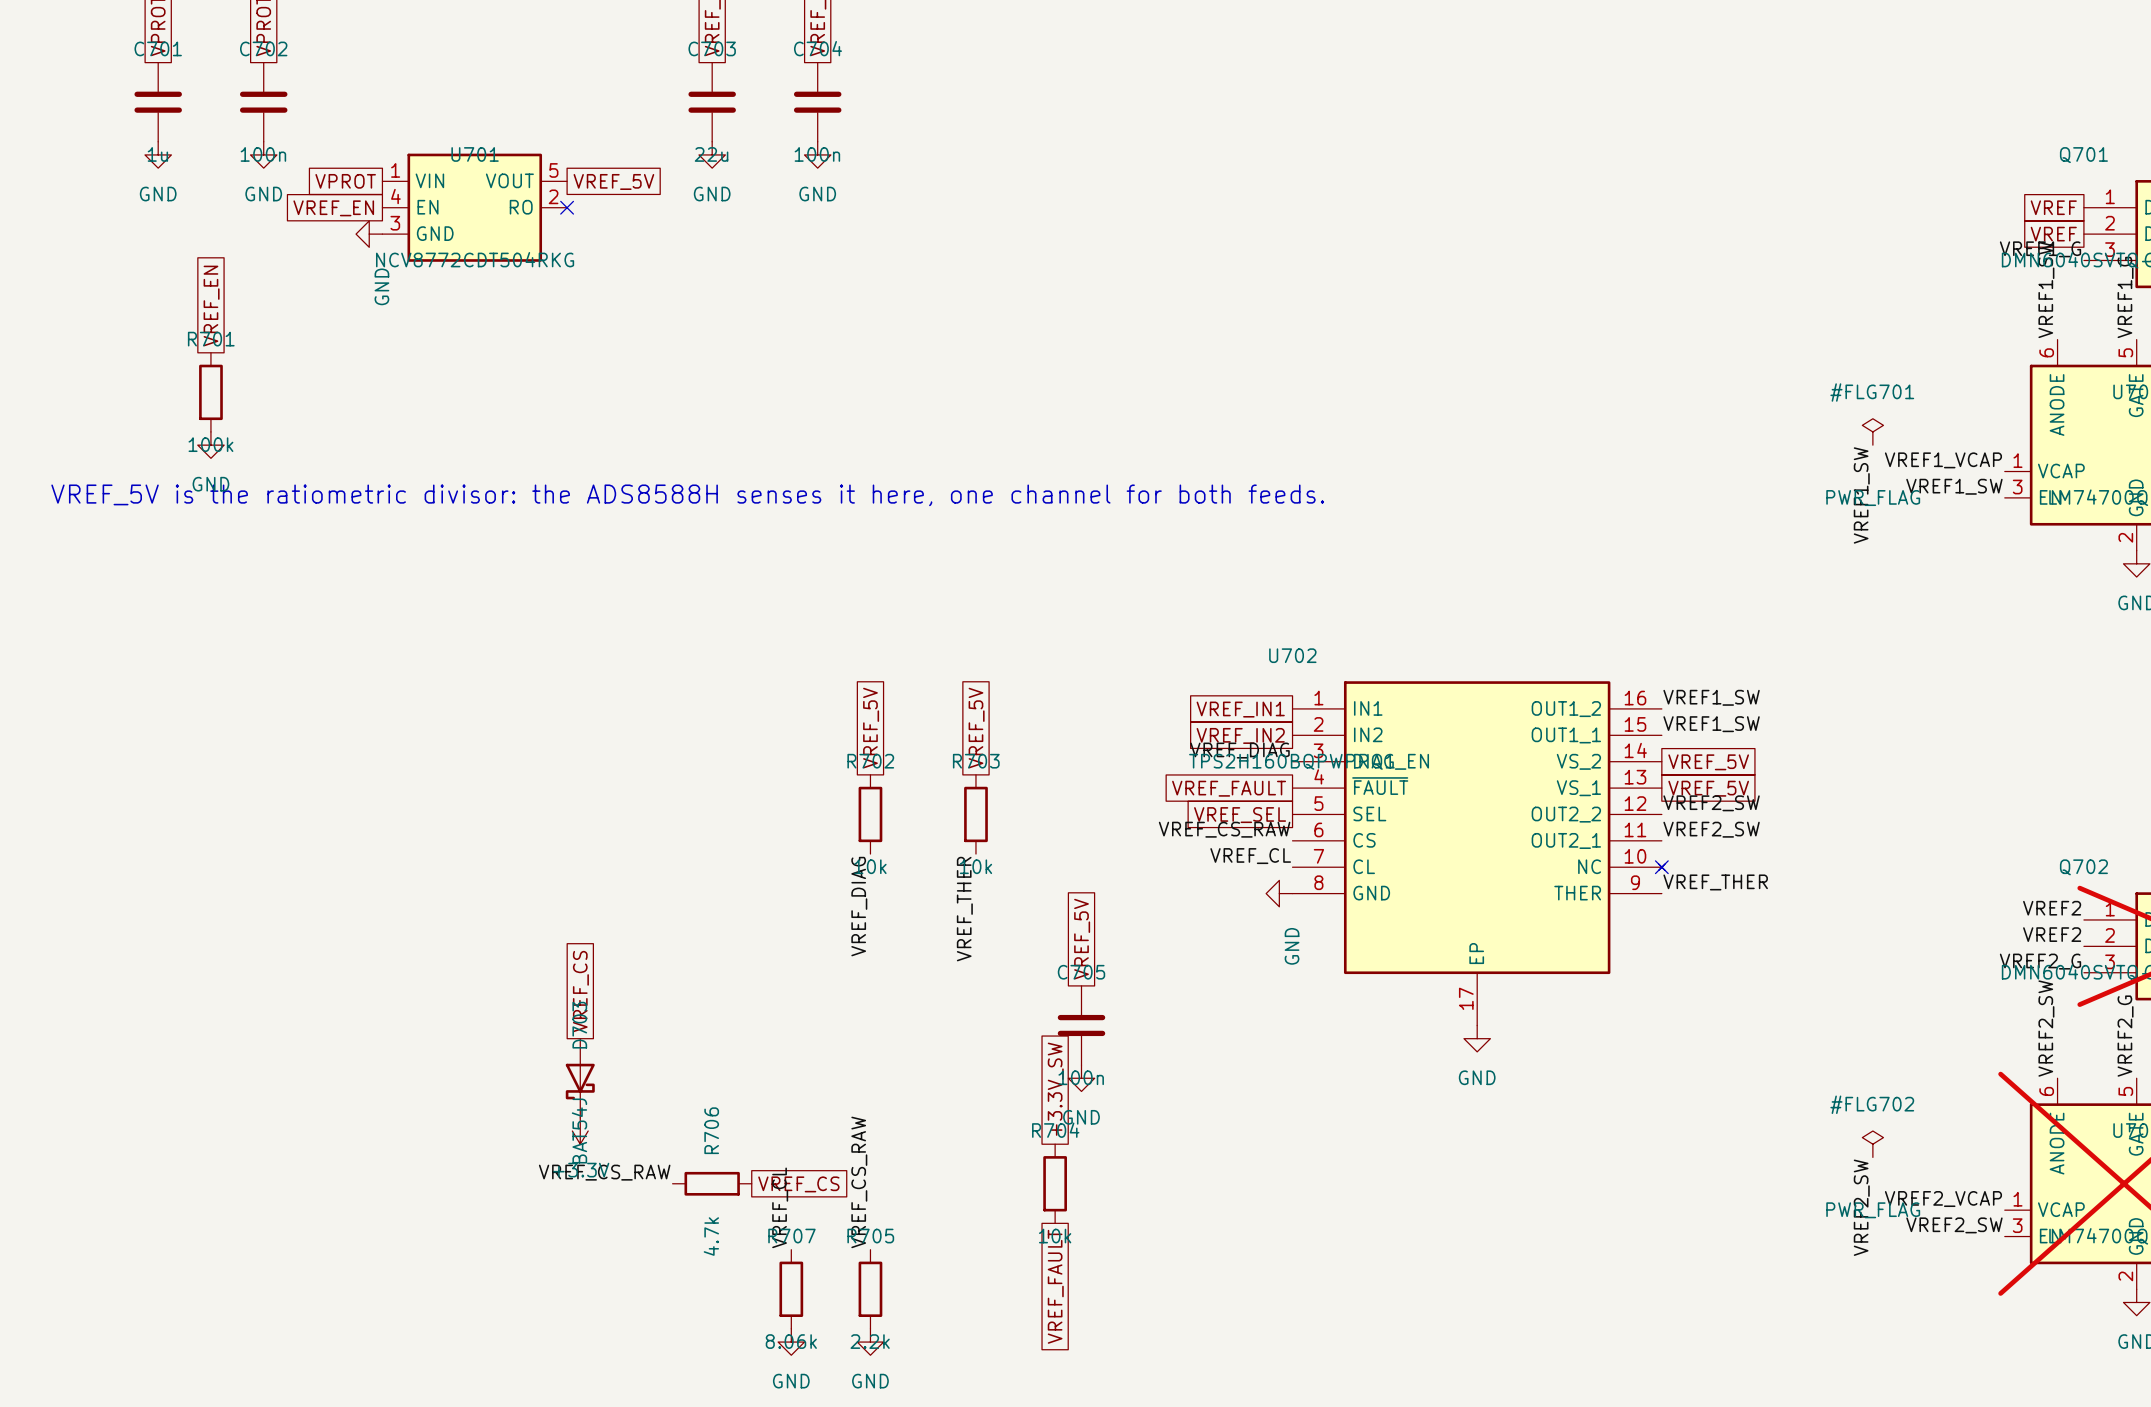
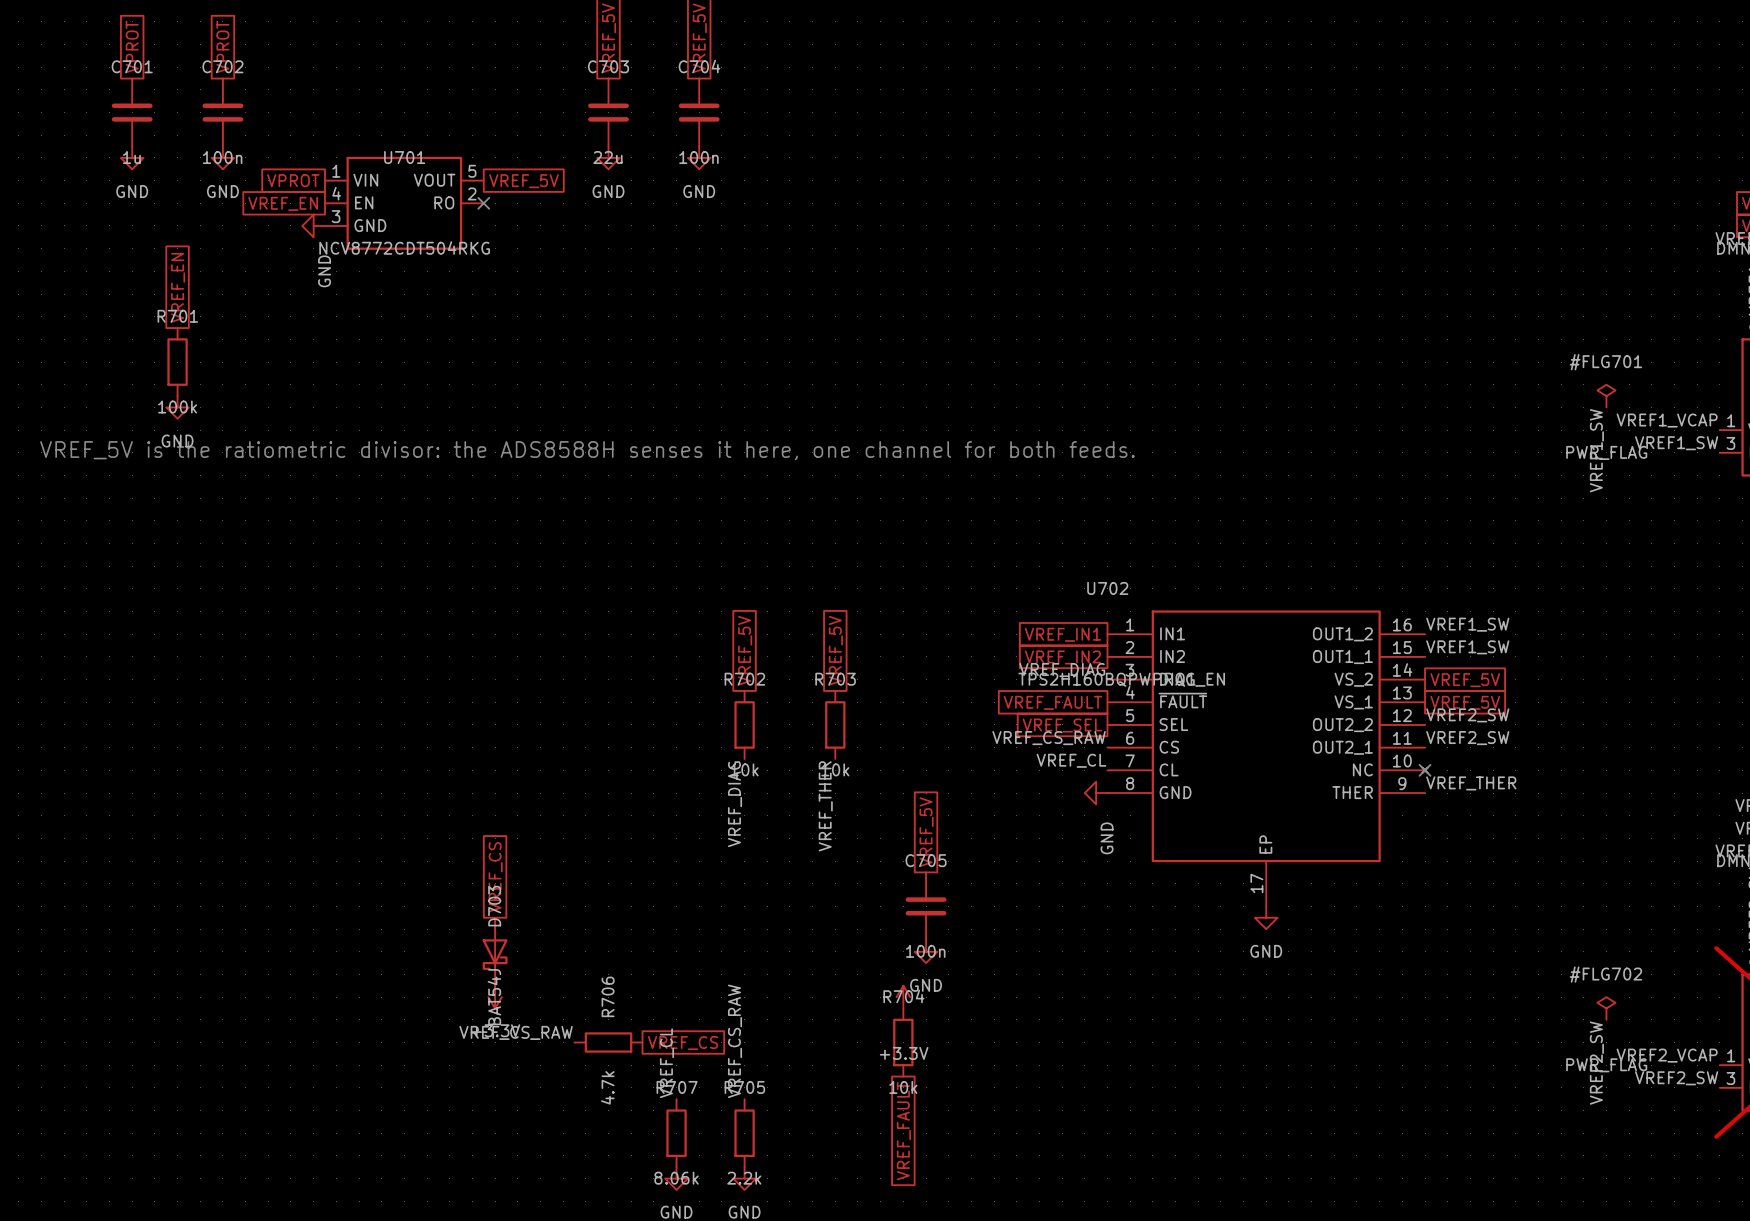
global label: +3.3V_SW (1055, 1089) -> none
power symbol: none -> +3.3V (903, 997)

